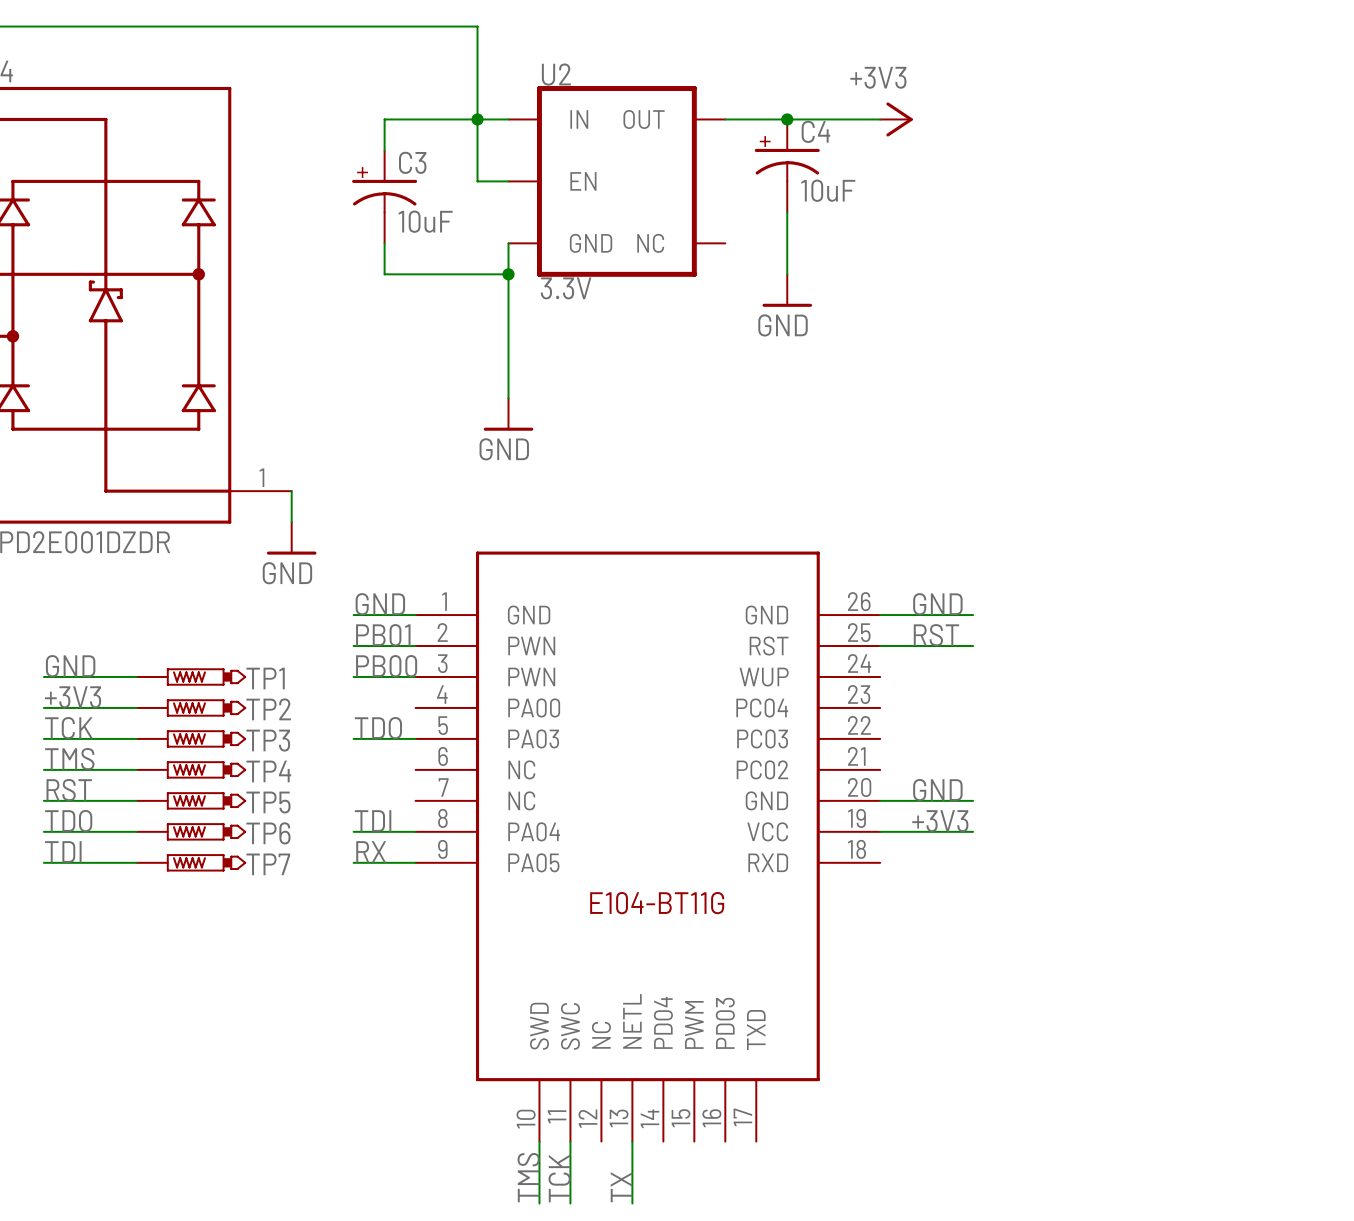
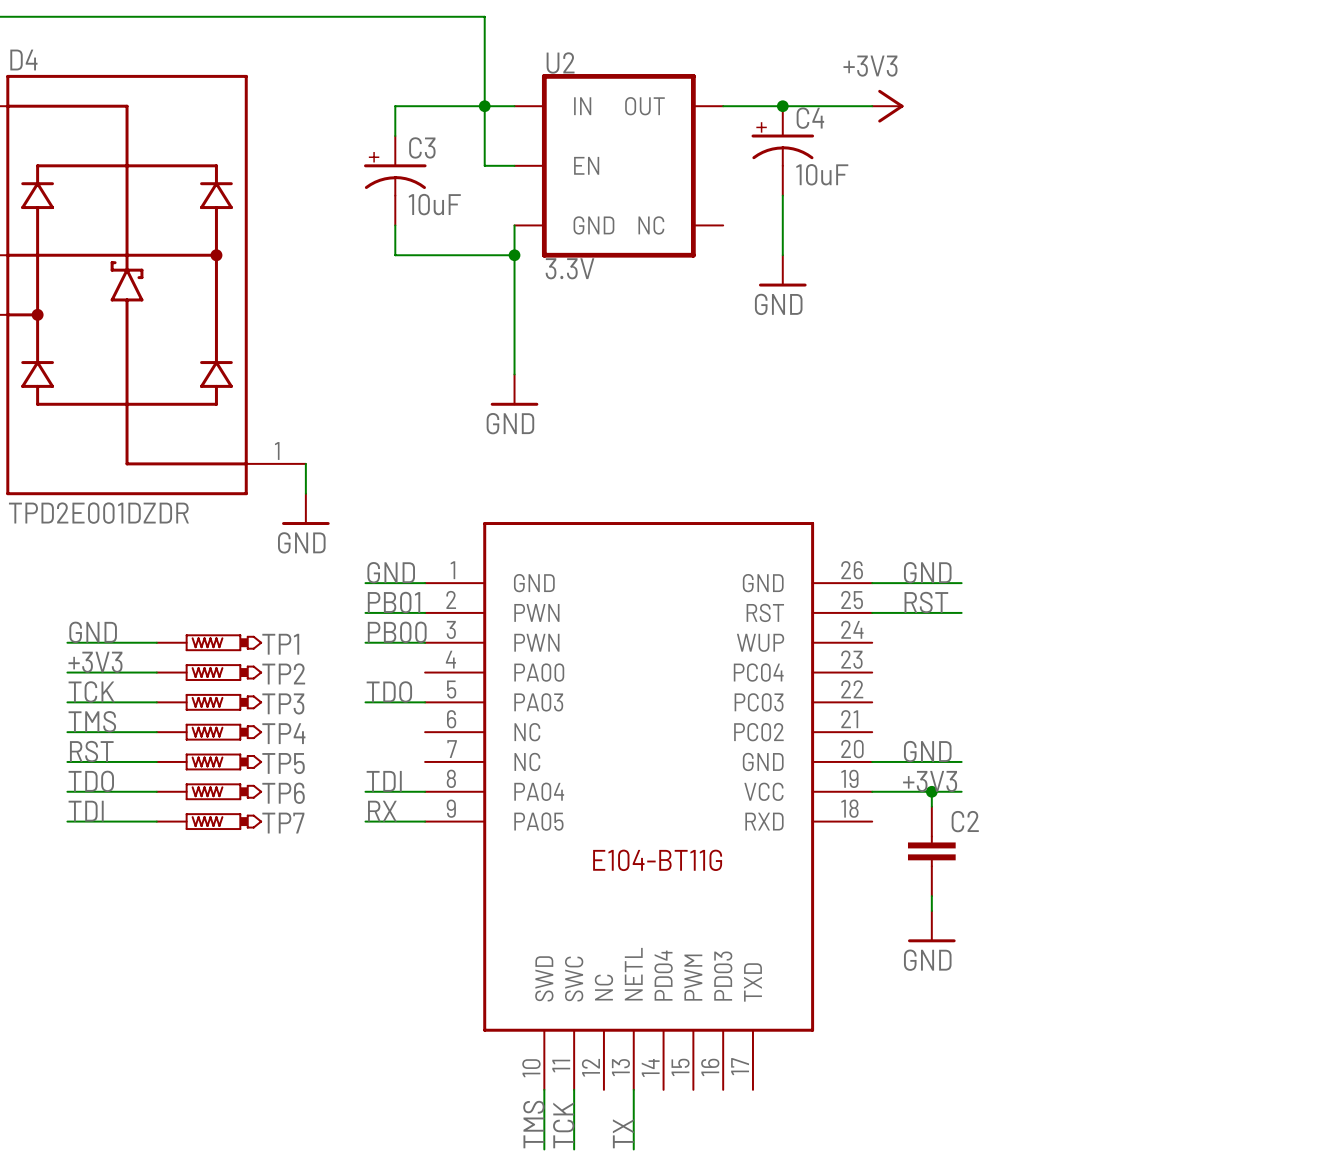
wire: none -> (931, 791) (931, 806)
junction: none -> (931, 791)
C2: none -> (931, 851)
wire: none -> (931, 896) (931, 911)
power symbol: none -> GND (931, 926)

